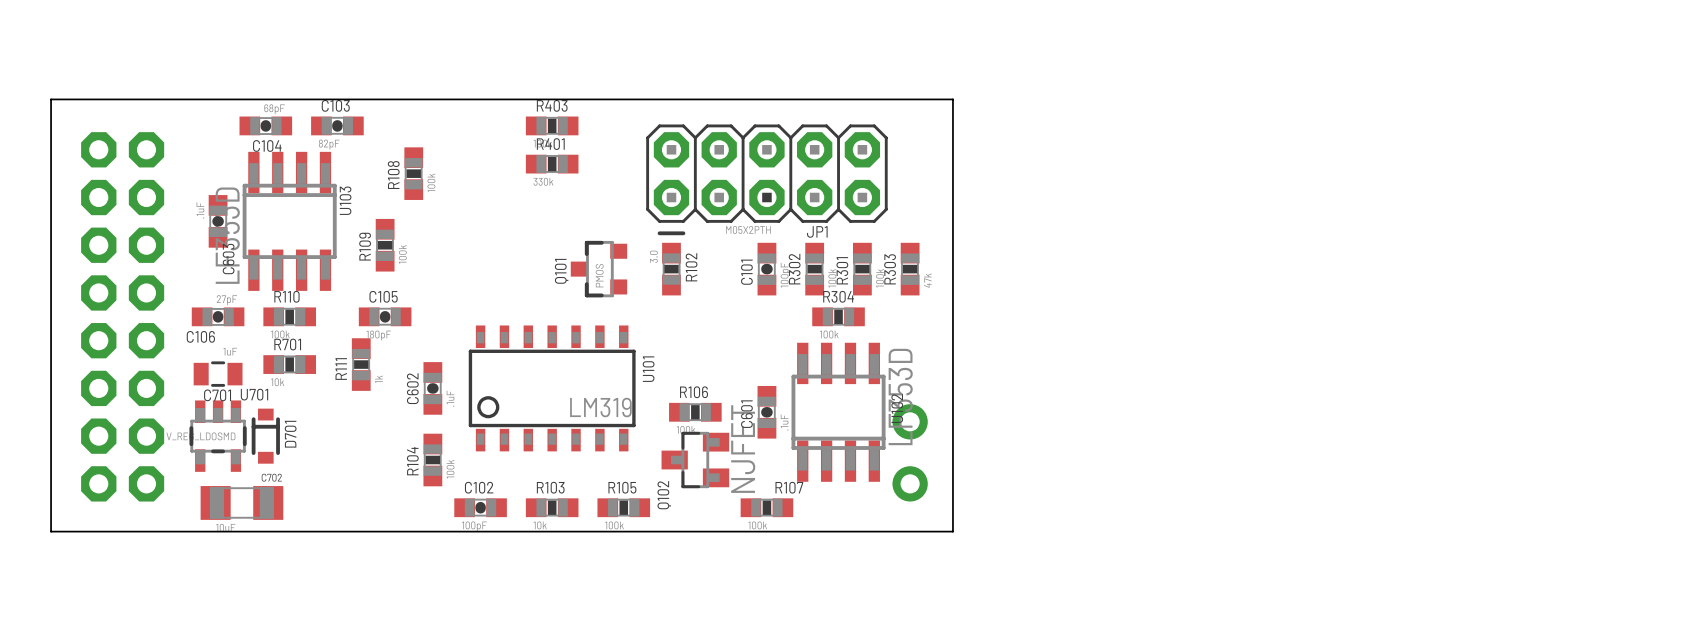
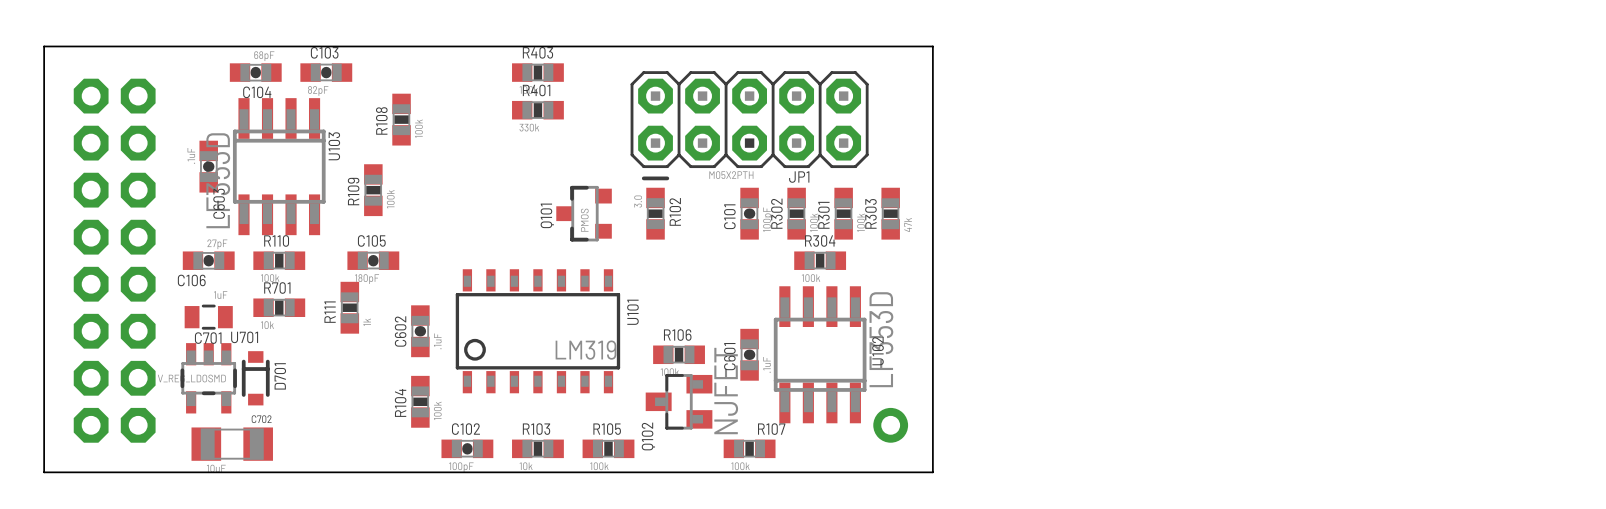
part: (910, 421) -> none

